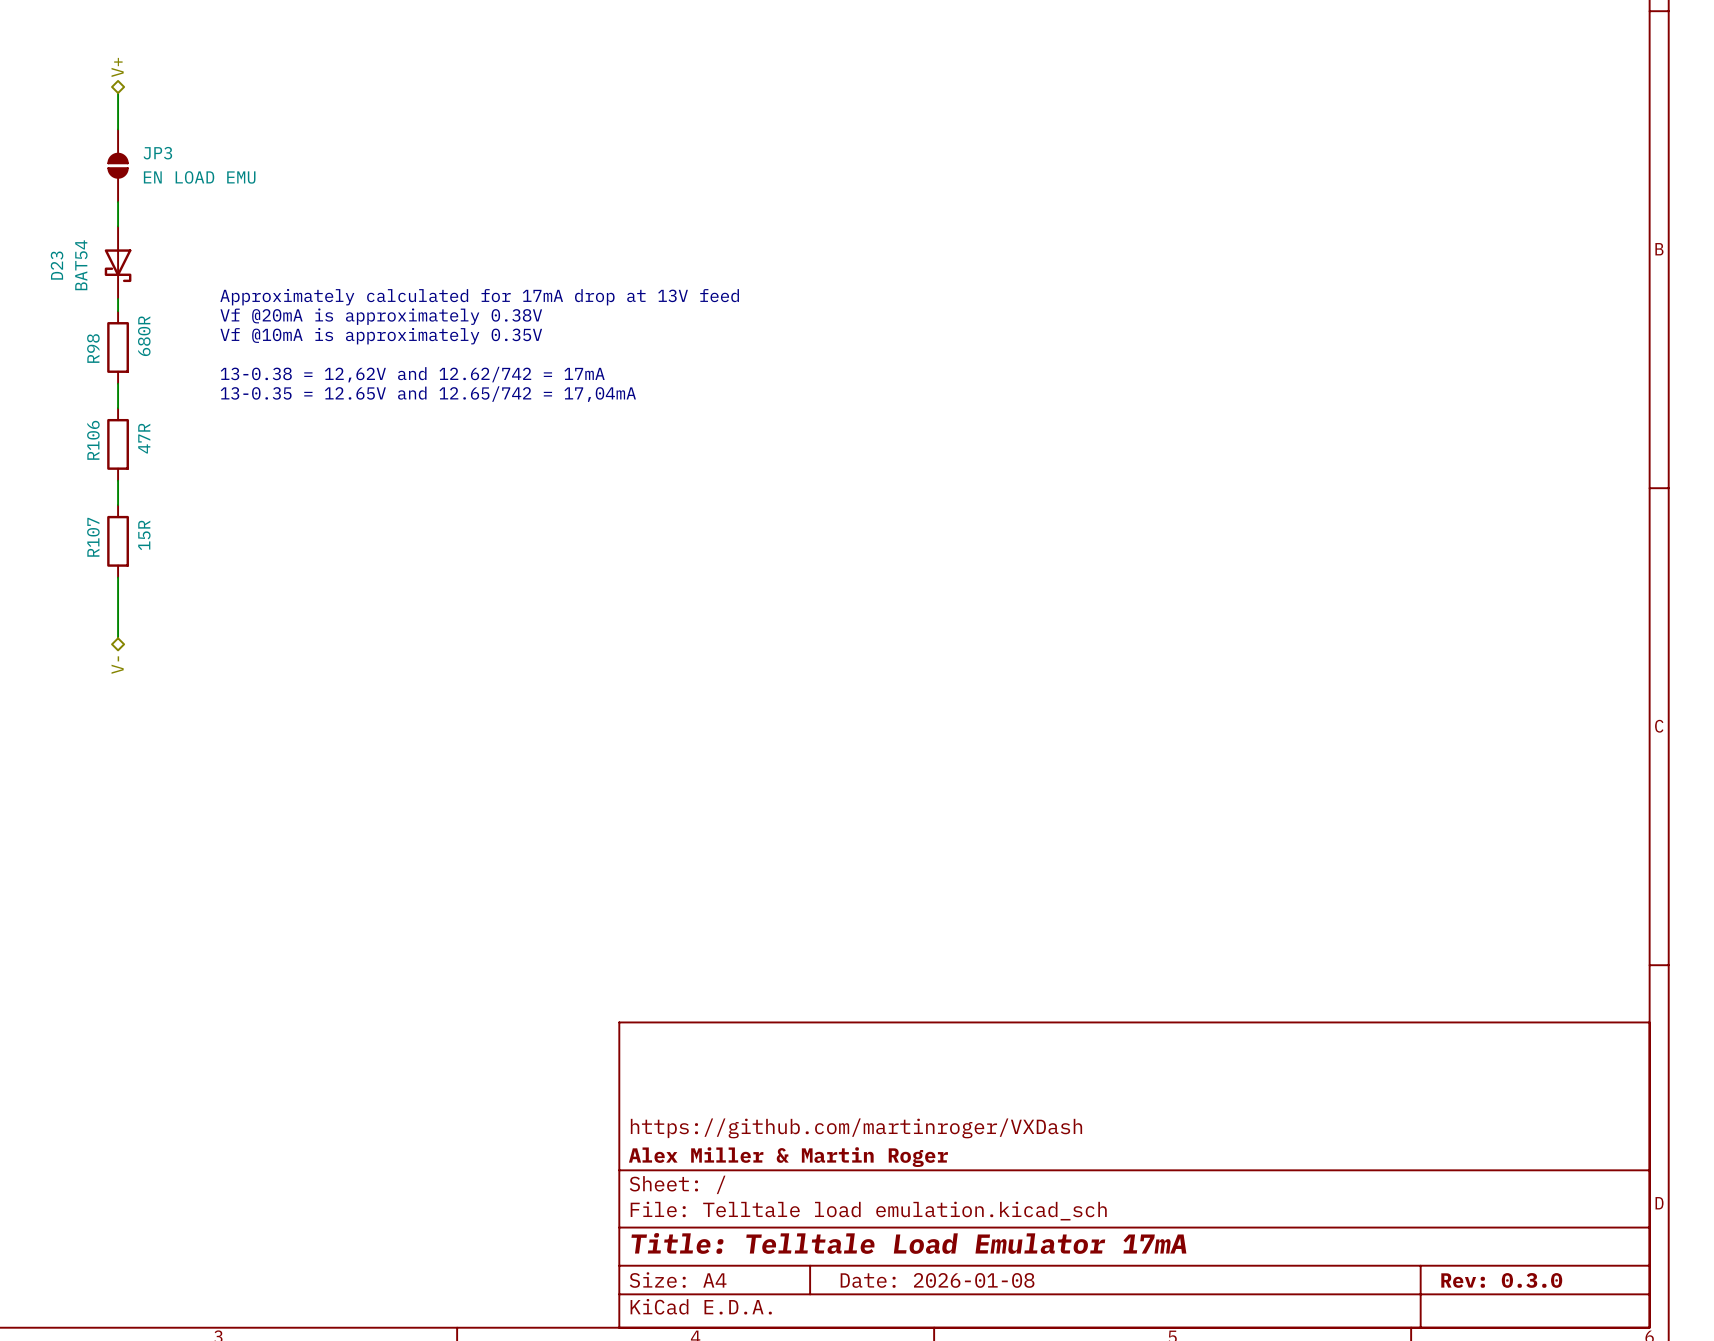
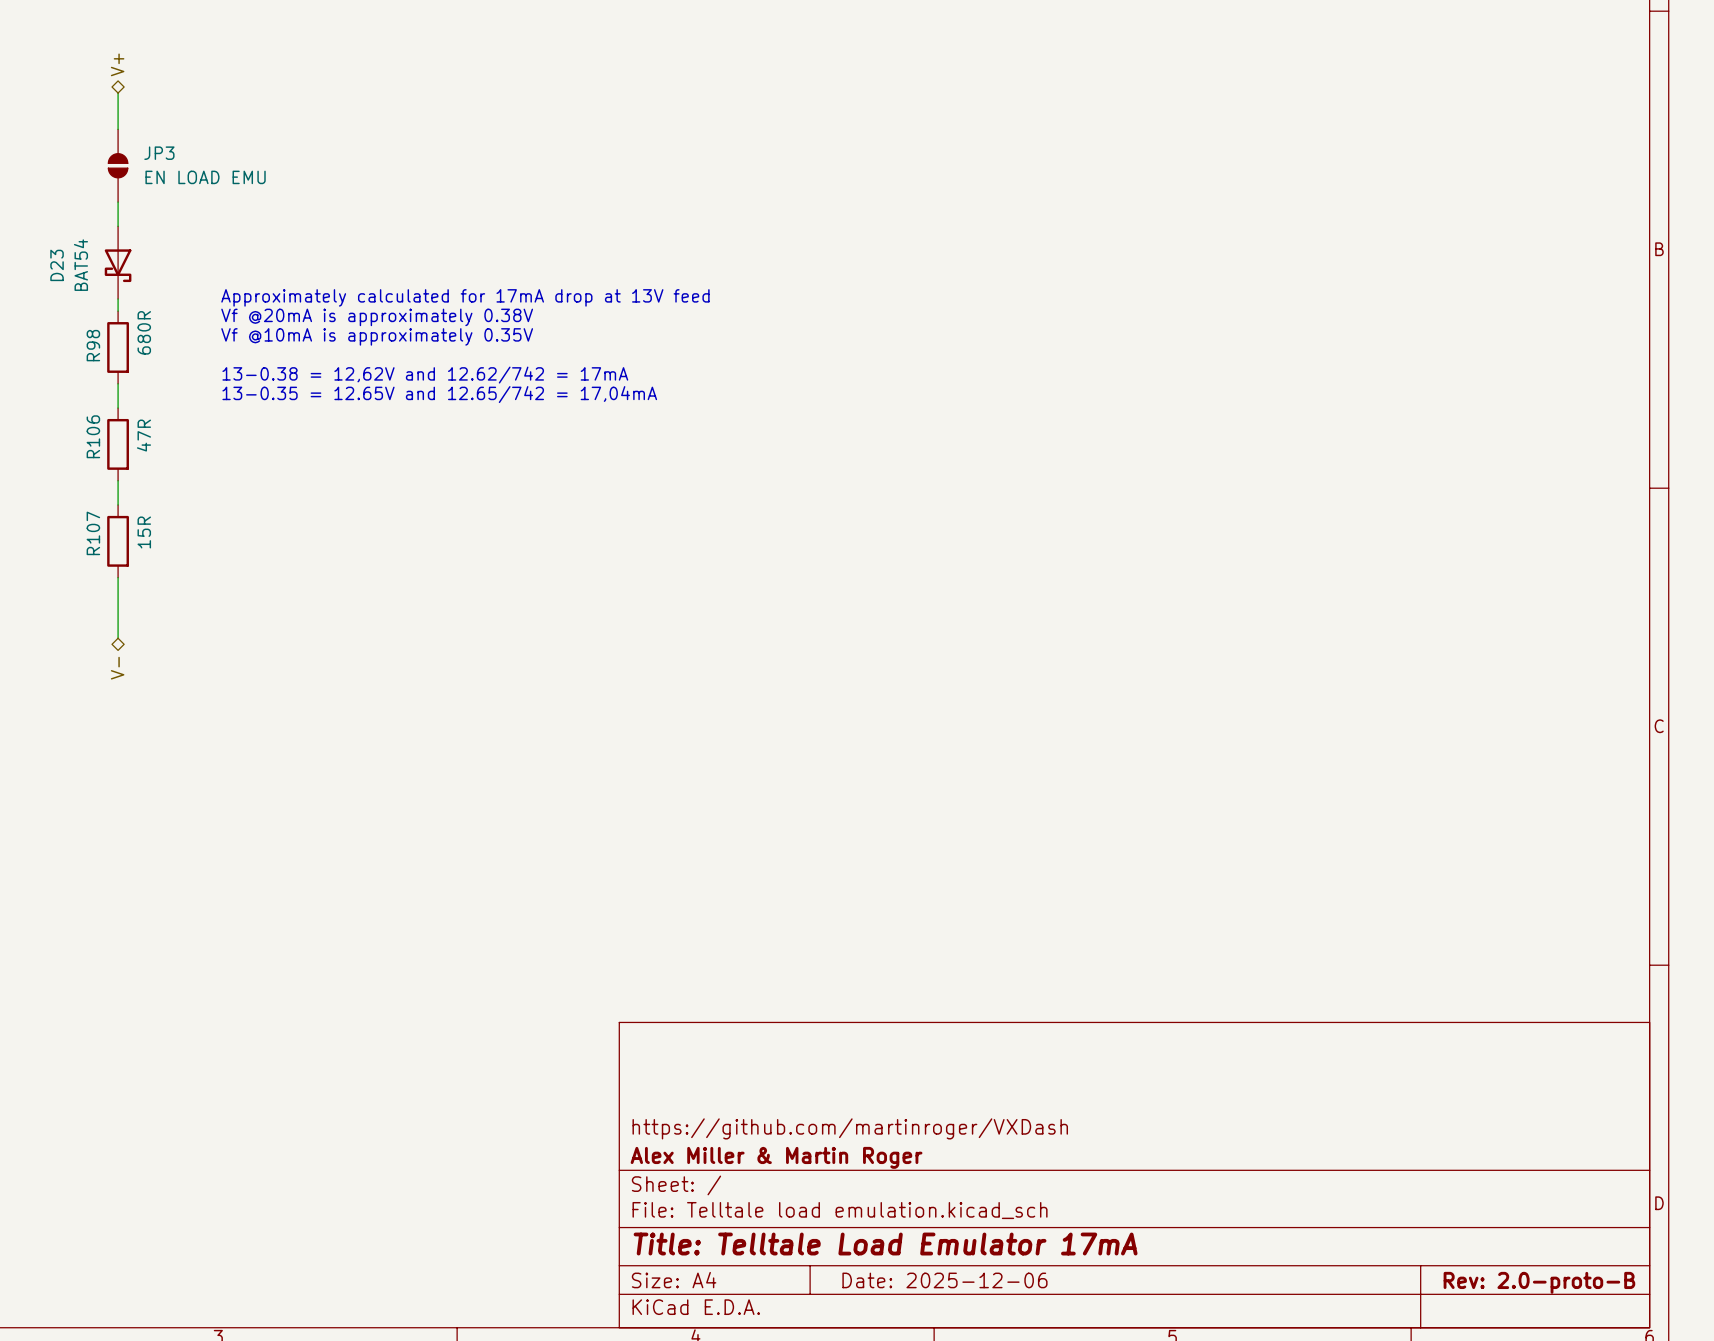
title block: Date: 2026-01-08 (937, 1280) -> Date: 2025-12-06 (944, 1280)
title block: Rev: 0.3.0 (1501, 1280) -> Rev: 2.0-proto-B (1539, 1282)

